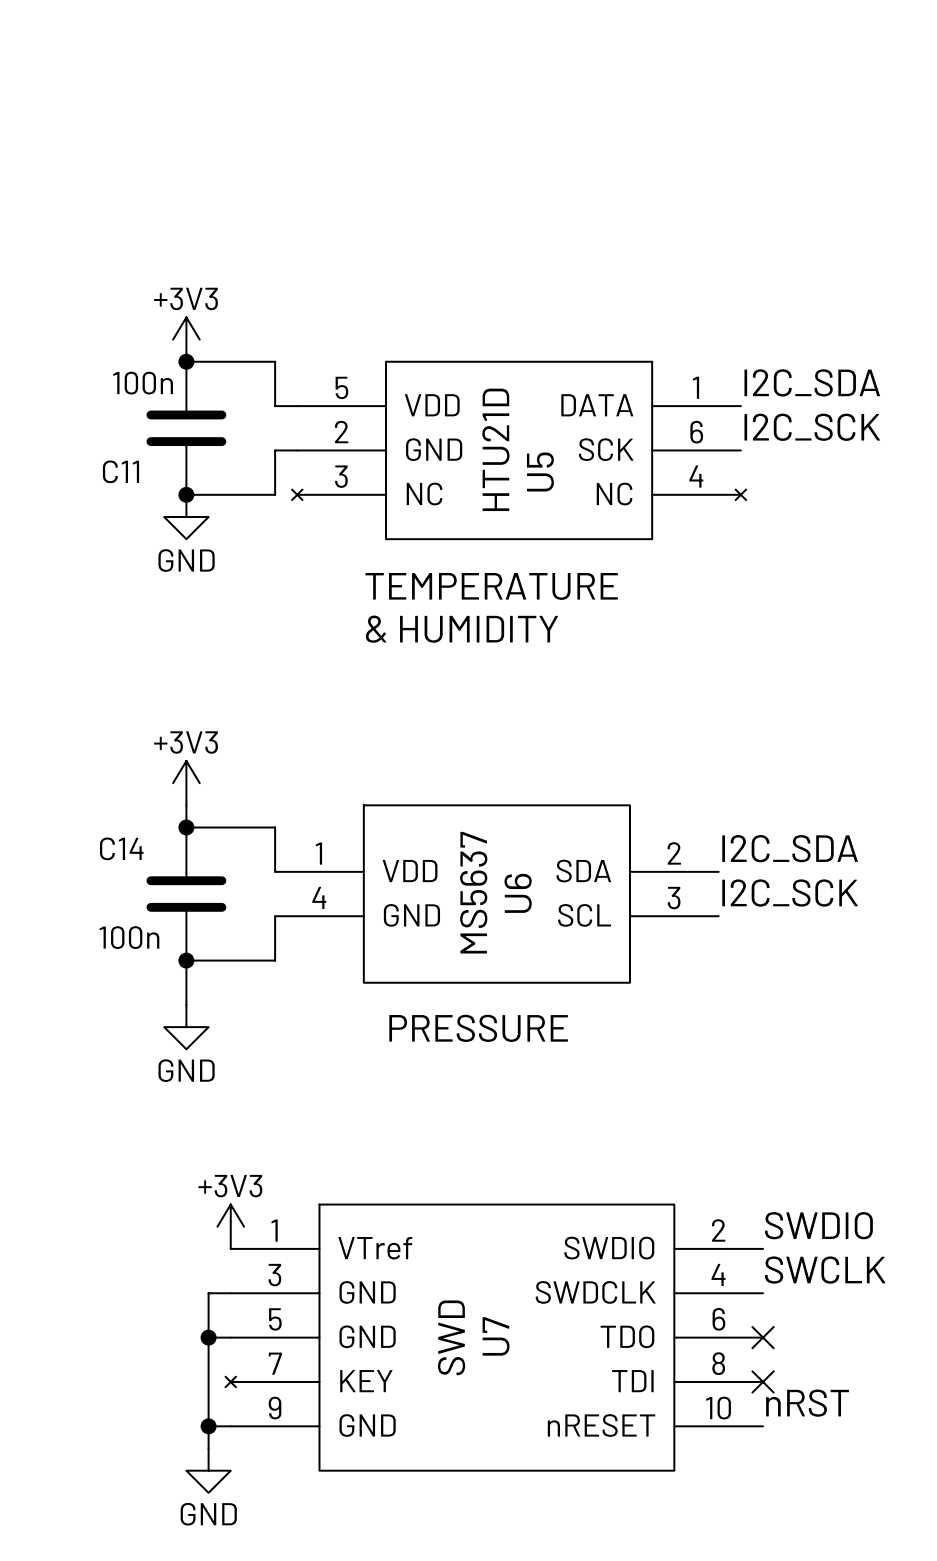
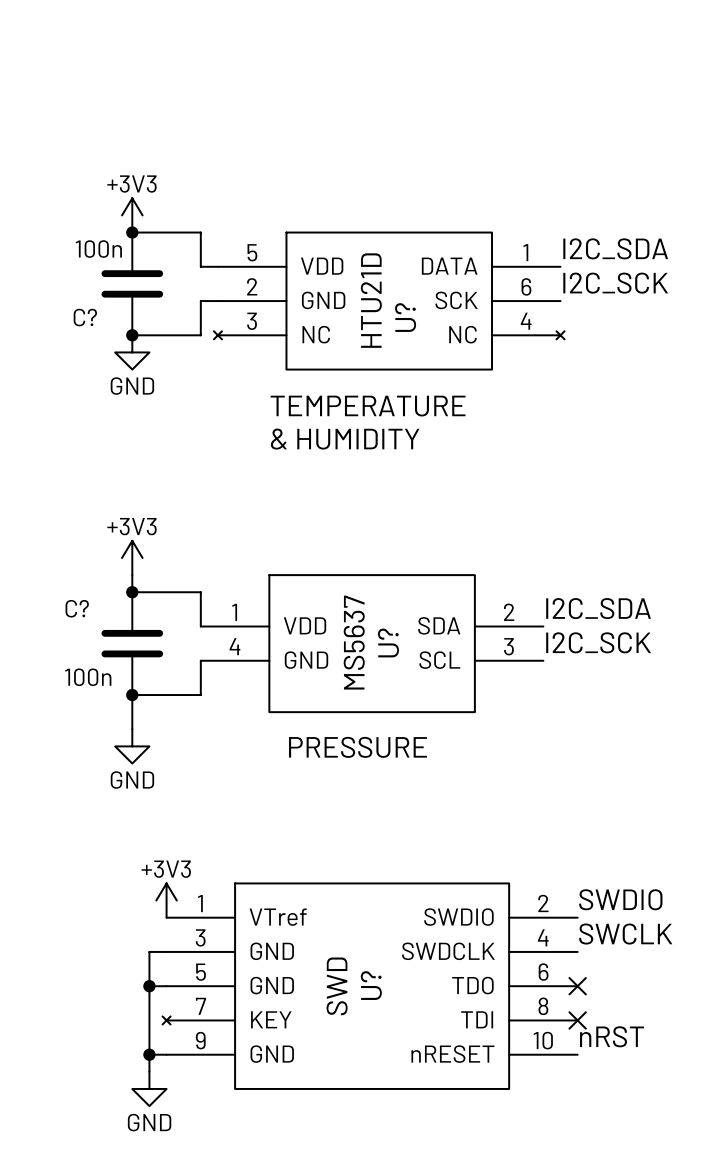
C11 name: C11 (121, 471) -> C? (85, 317)
U5 name: U5 (540, 471) -> U? (405, 317)
C14 name: C14 (121, 848) -> C? (77, 608)
U6 name: U6 (518, 893) -> U? (388, 643)
U7 name: U7 (496, 1336) -> U? (371, 985)

